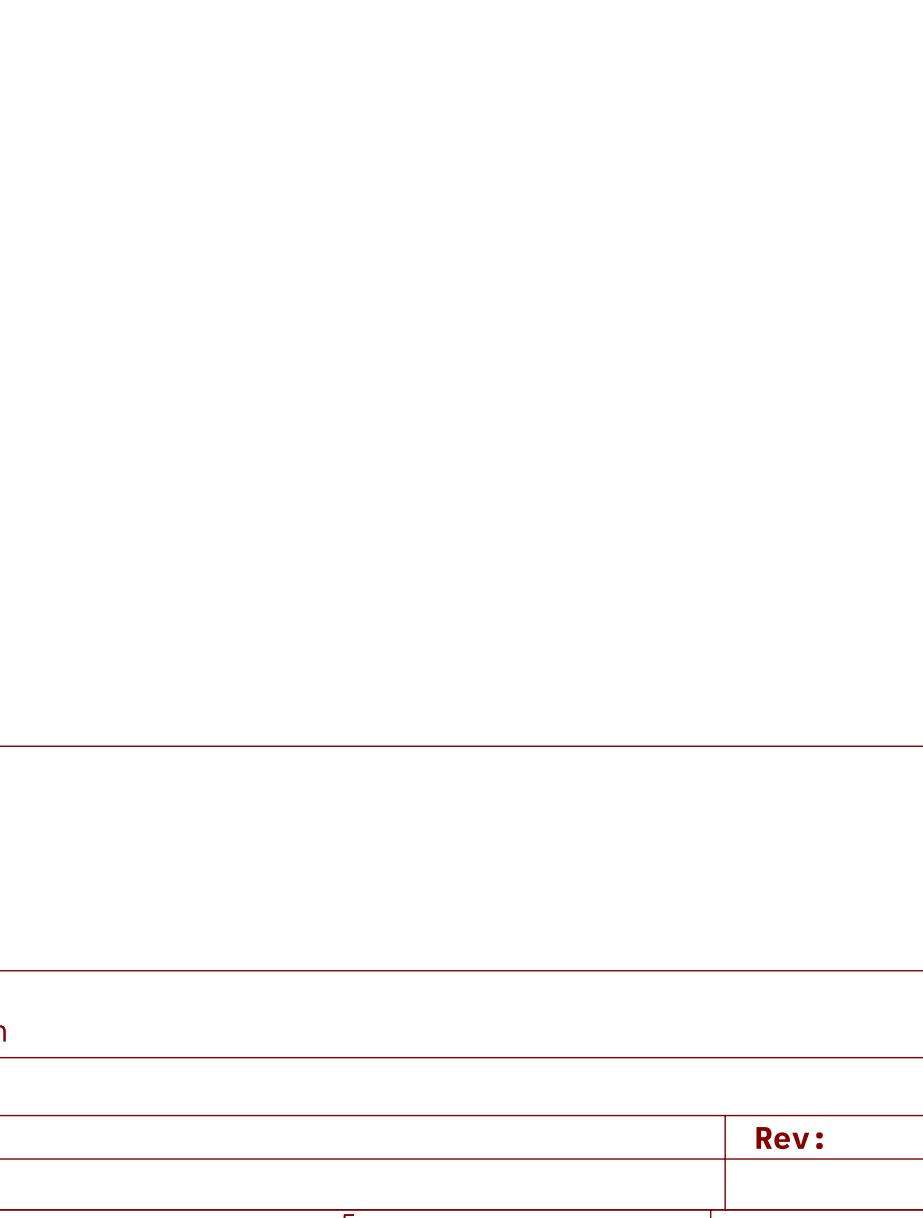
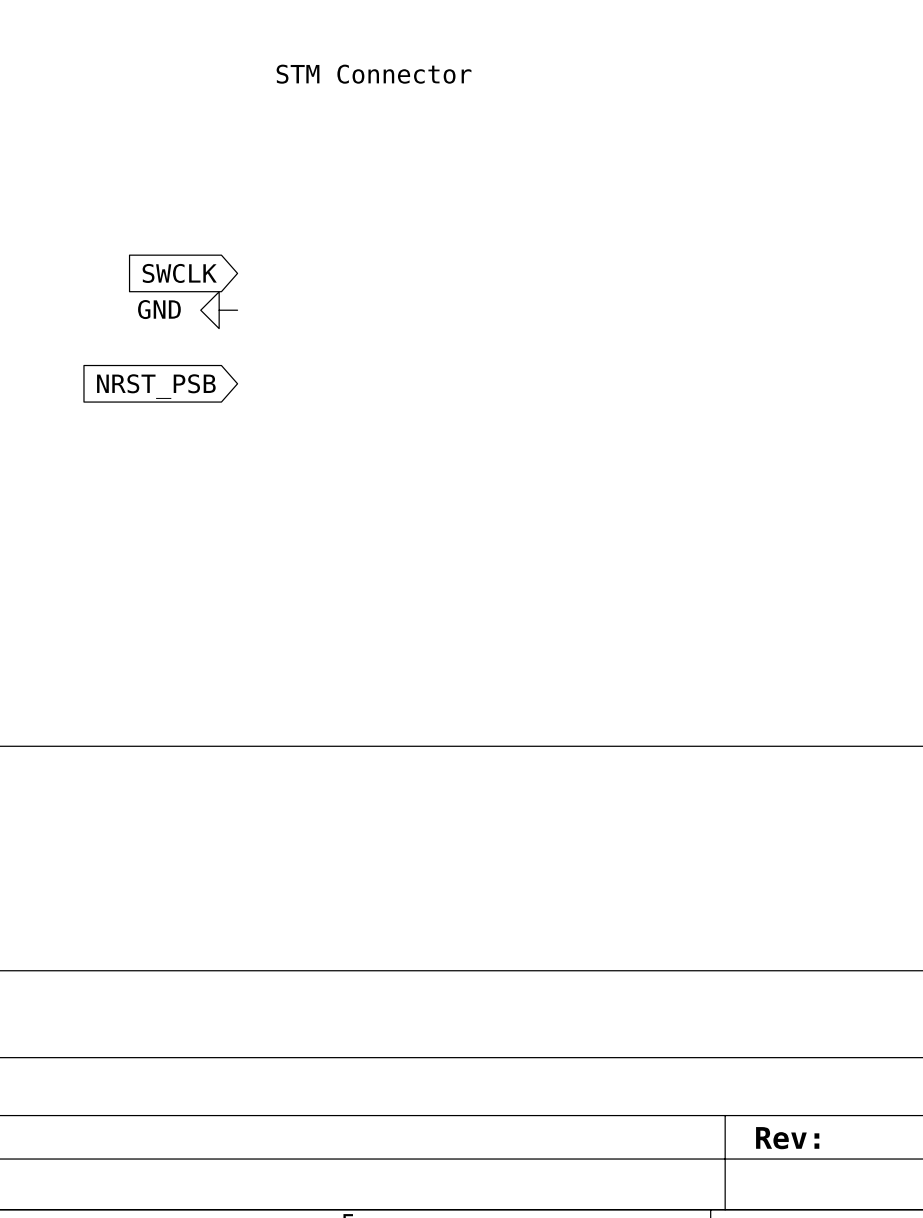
text: none -> STM Connector (374, 74)
global label: none -> SWCLK (179, 273)
power symbol: none -> GND (219, 310)
global label: none -> NRST_PSB (156, 386)

